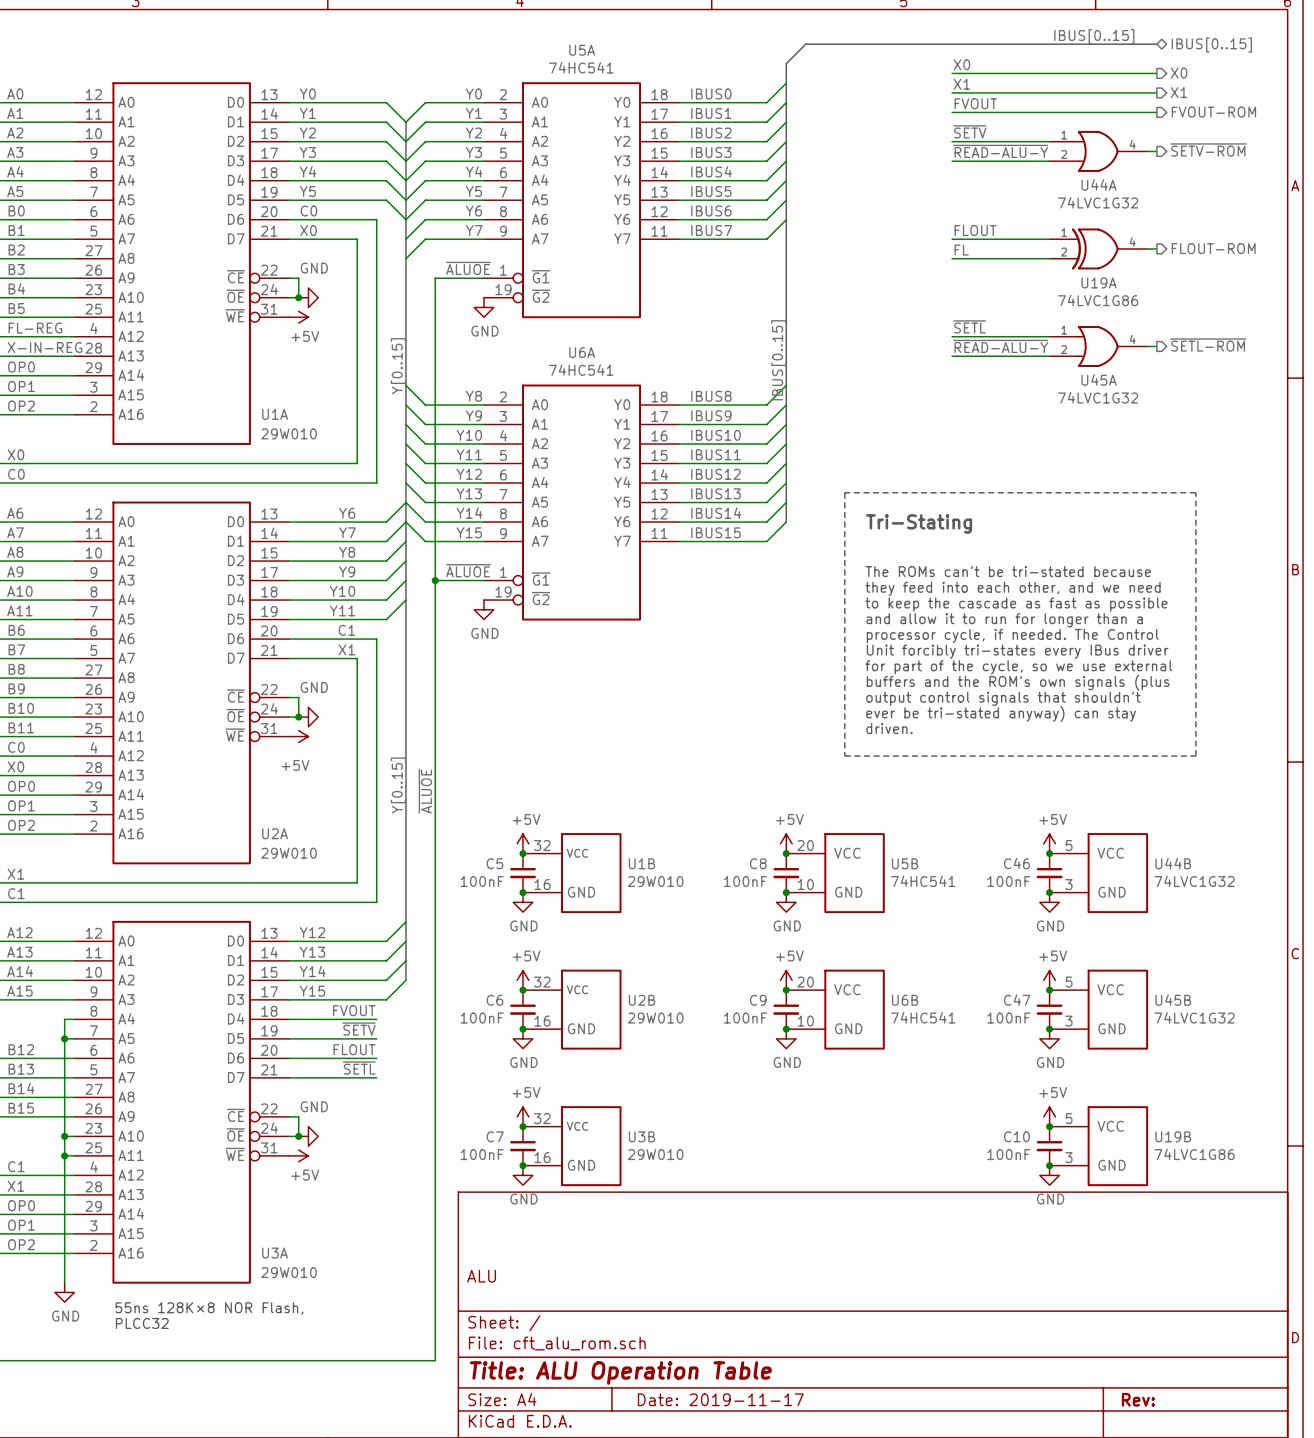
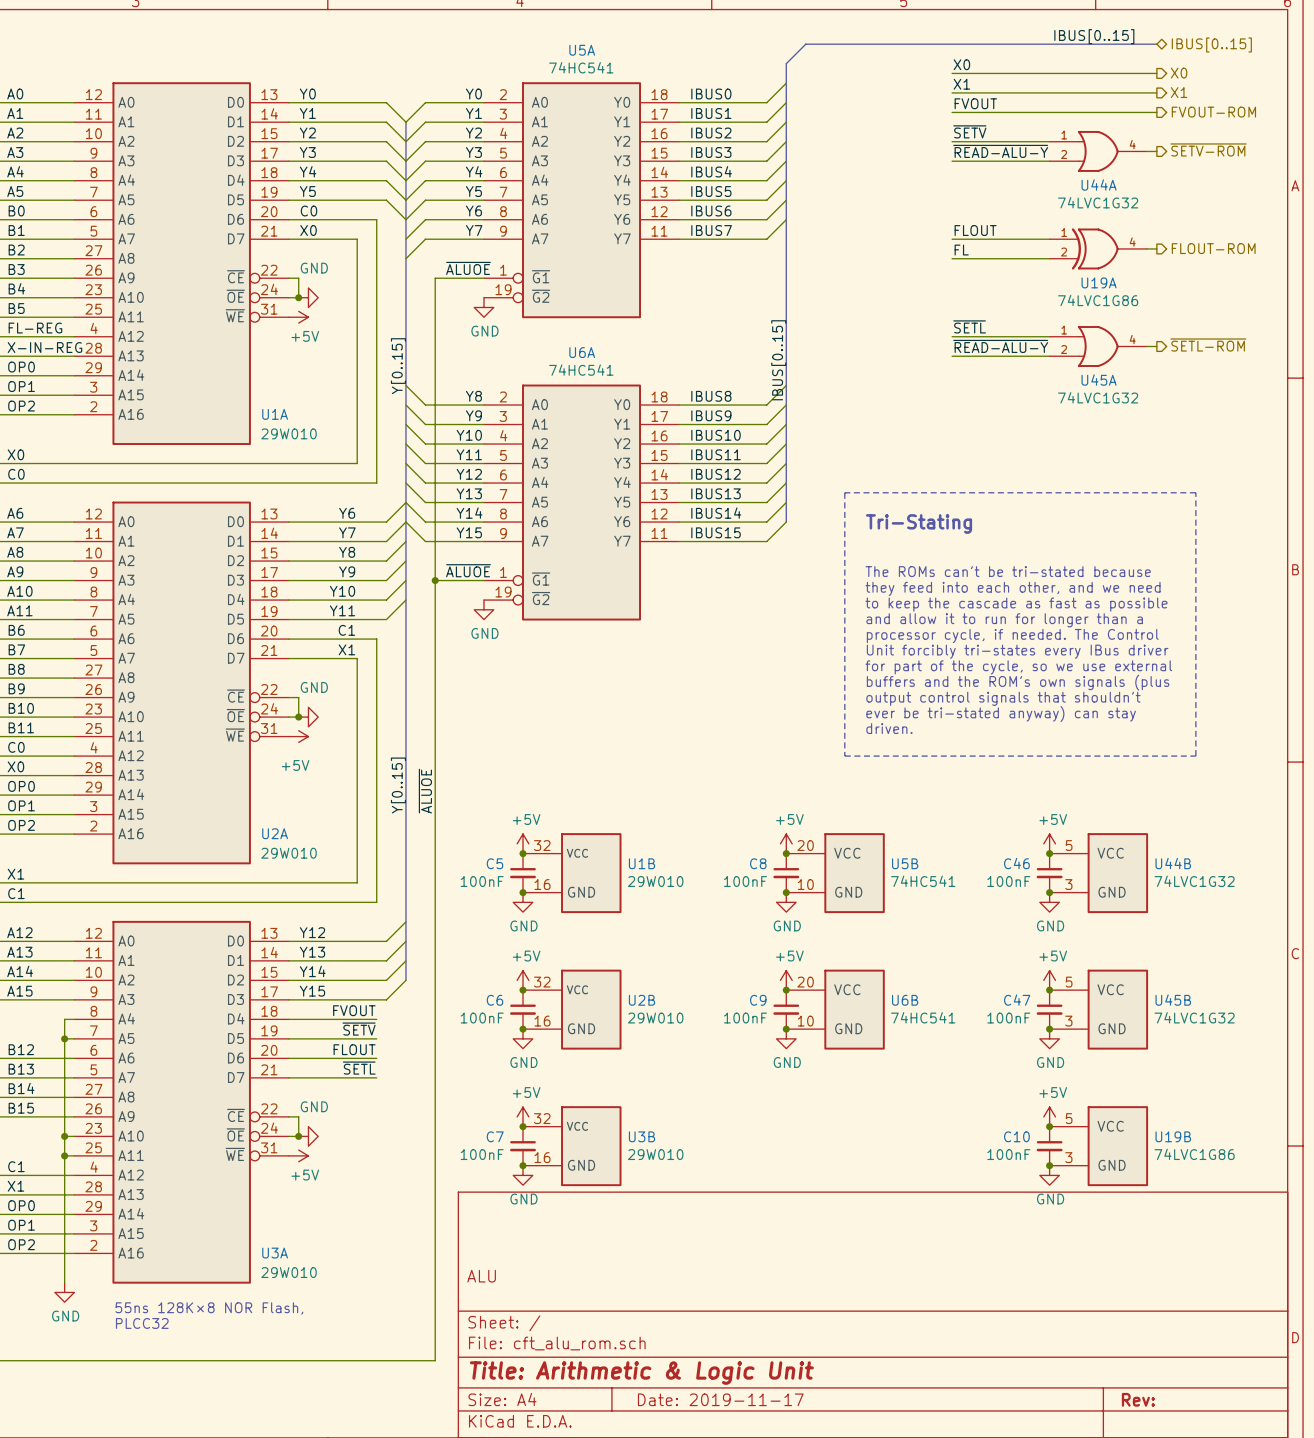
title block: Title: ALU Operation Table (620, 1373) -> Title: Arithmetic & Logic Unit (641, 1373)

